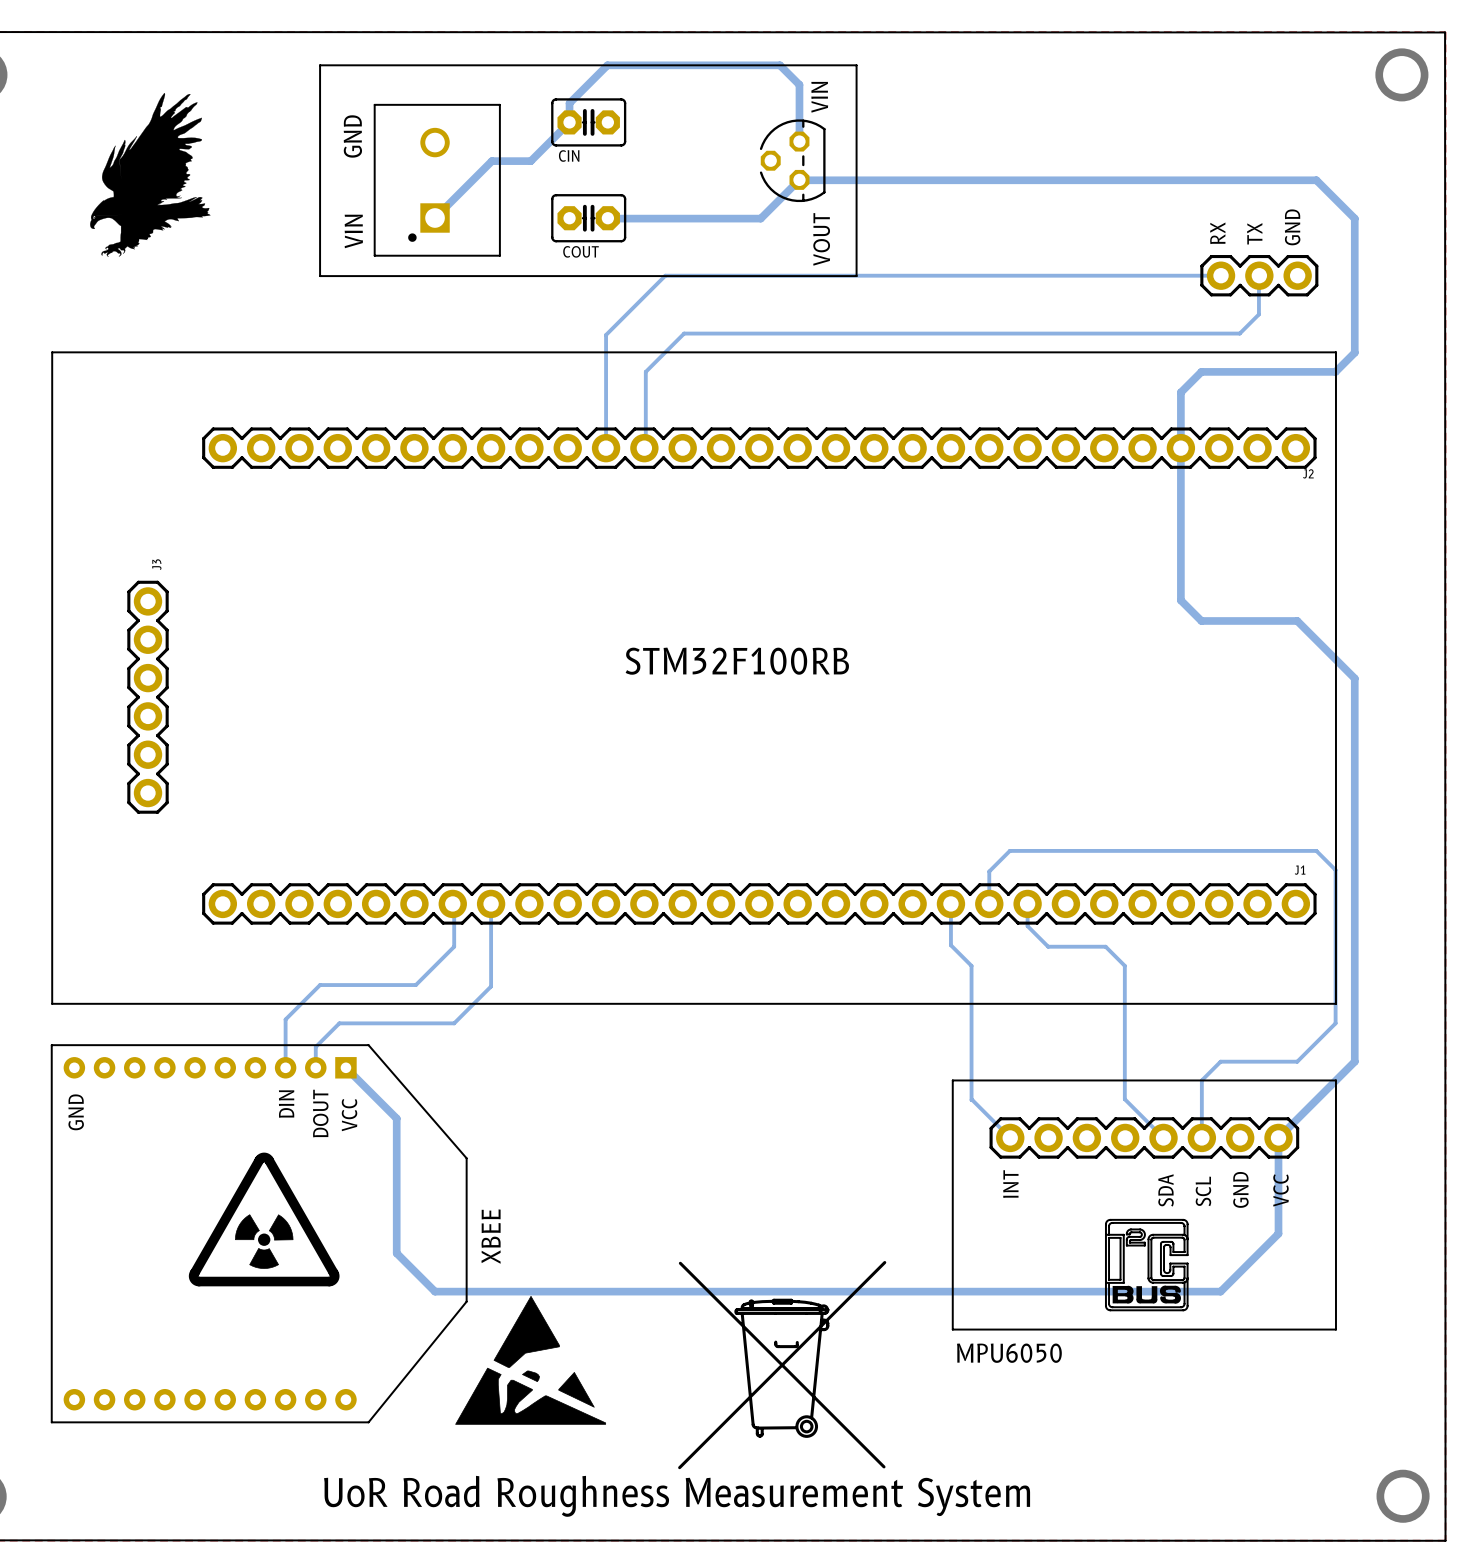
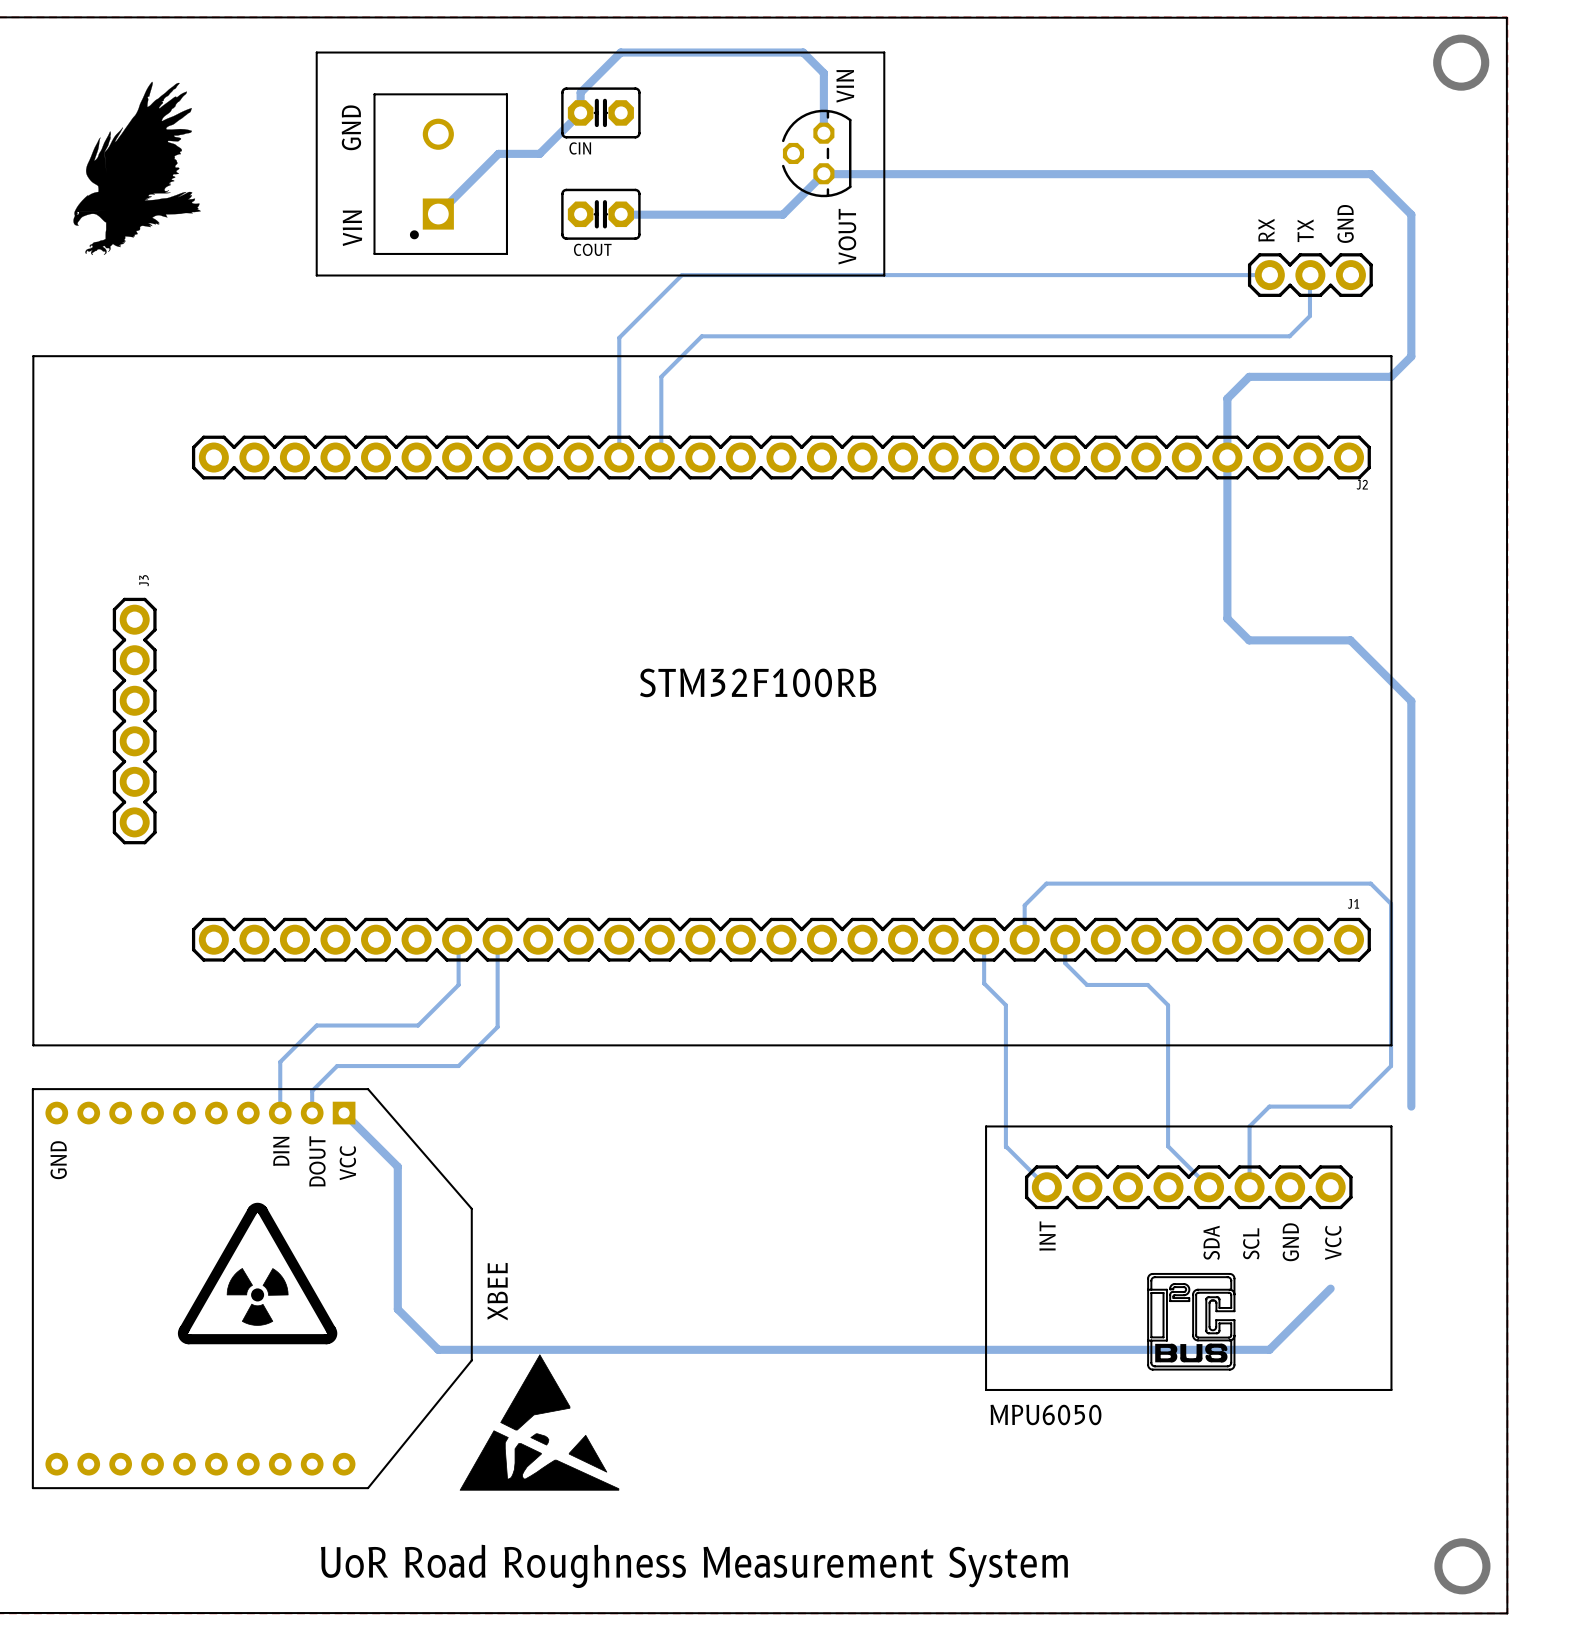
bottom track: (1354, 1061) (1278, 1137) (1278, 1233) -> none
drawing: [678, 1260, 887, 1470] -> none

